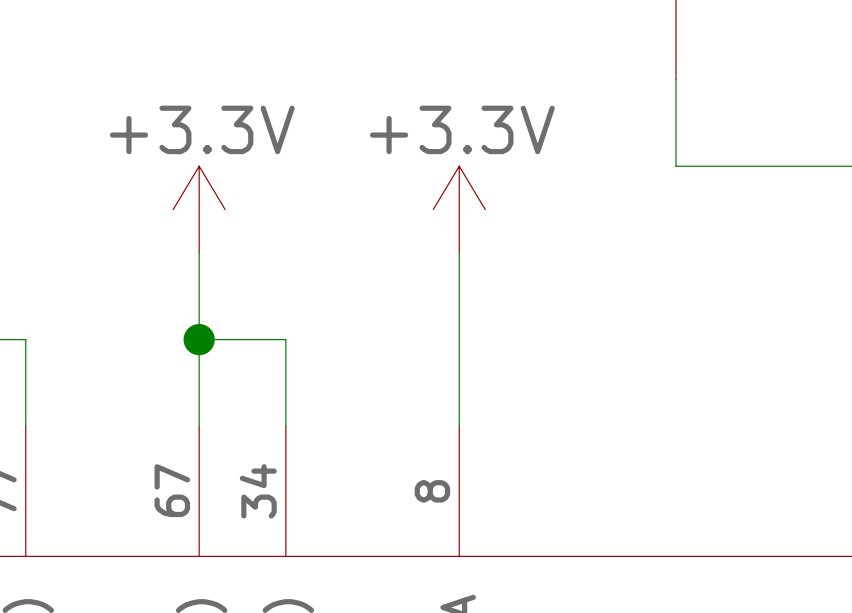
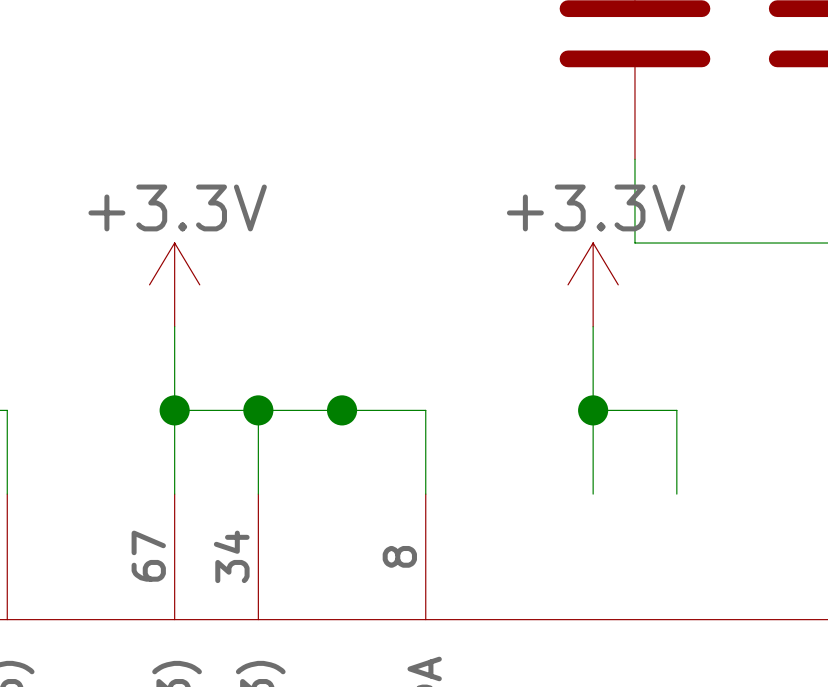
power symbol position: +3.3V (459, 209) -> +3.3V (593, 284)
wire: (459, 252) (459, 339) -> (258, 410) (425, 410)
wire: none -> (593, 326) (593, 494)
junction: none -> (258, 410)
junction: none -> (342, 410)
wire: none -> (593, 410) (676, 410) (676, 494)
junction: none -> (593, 410)

